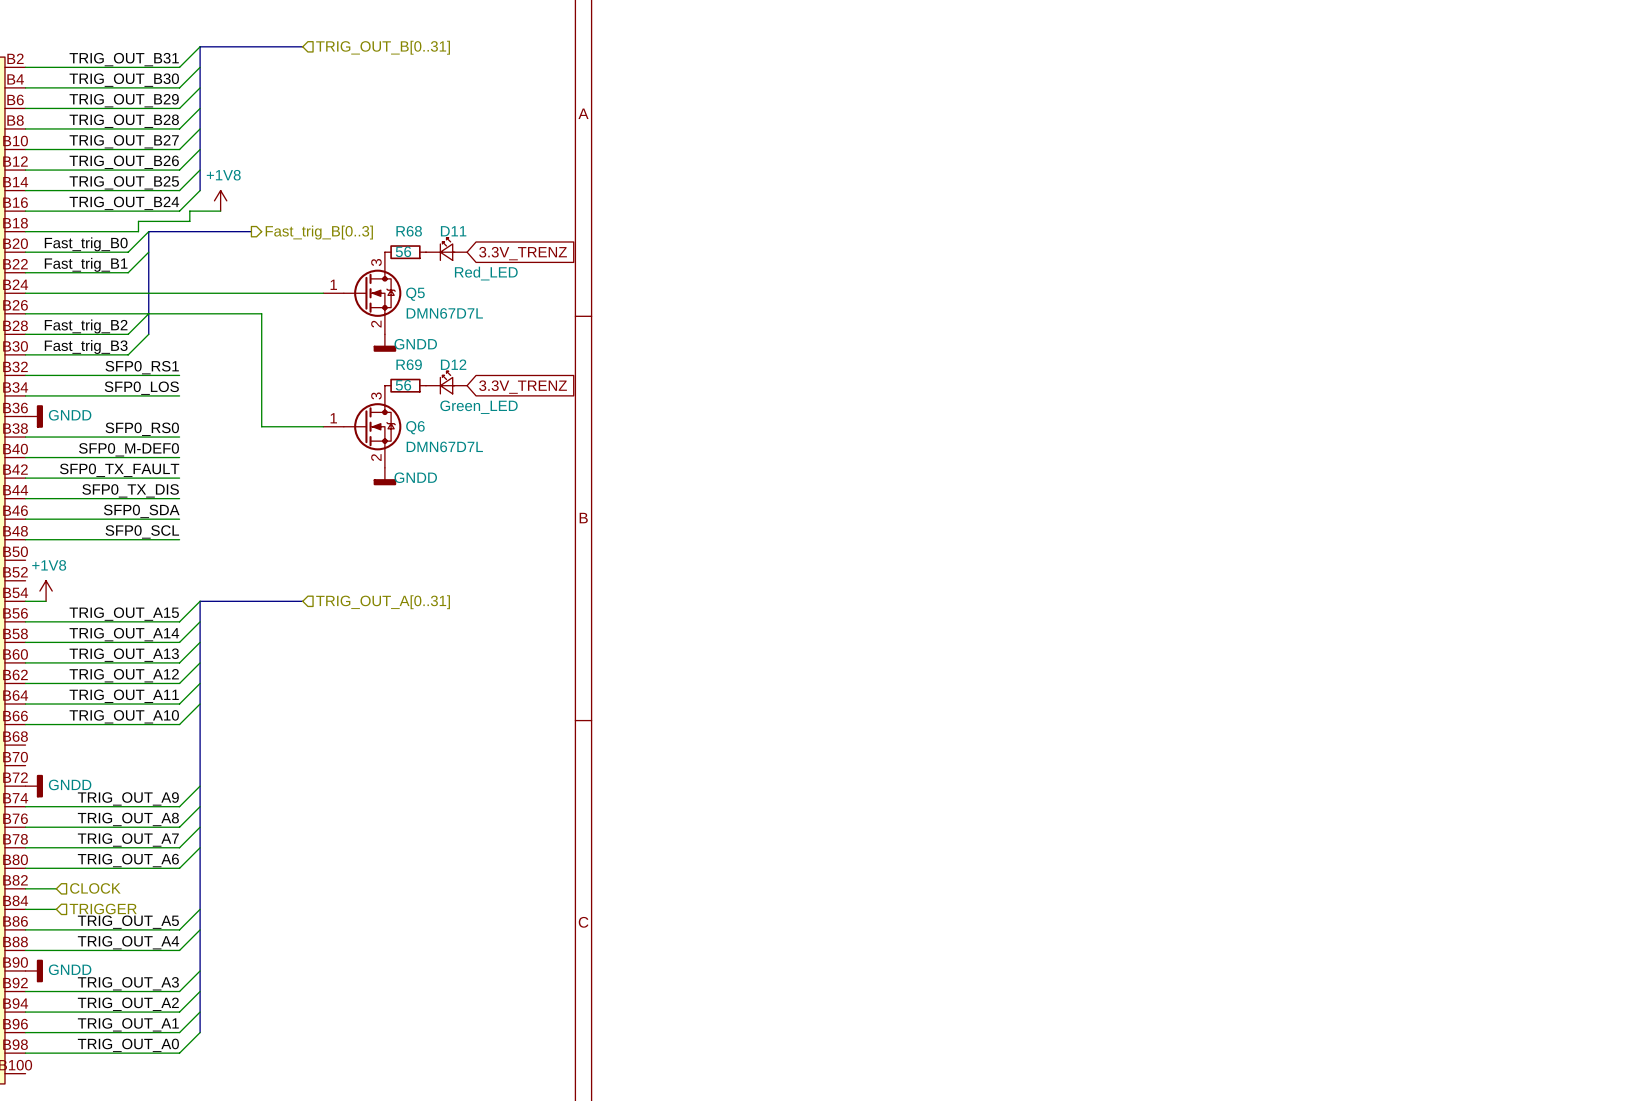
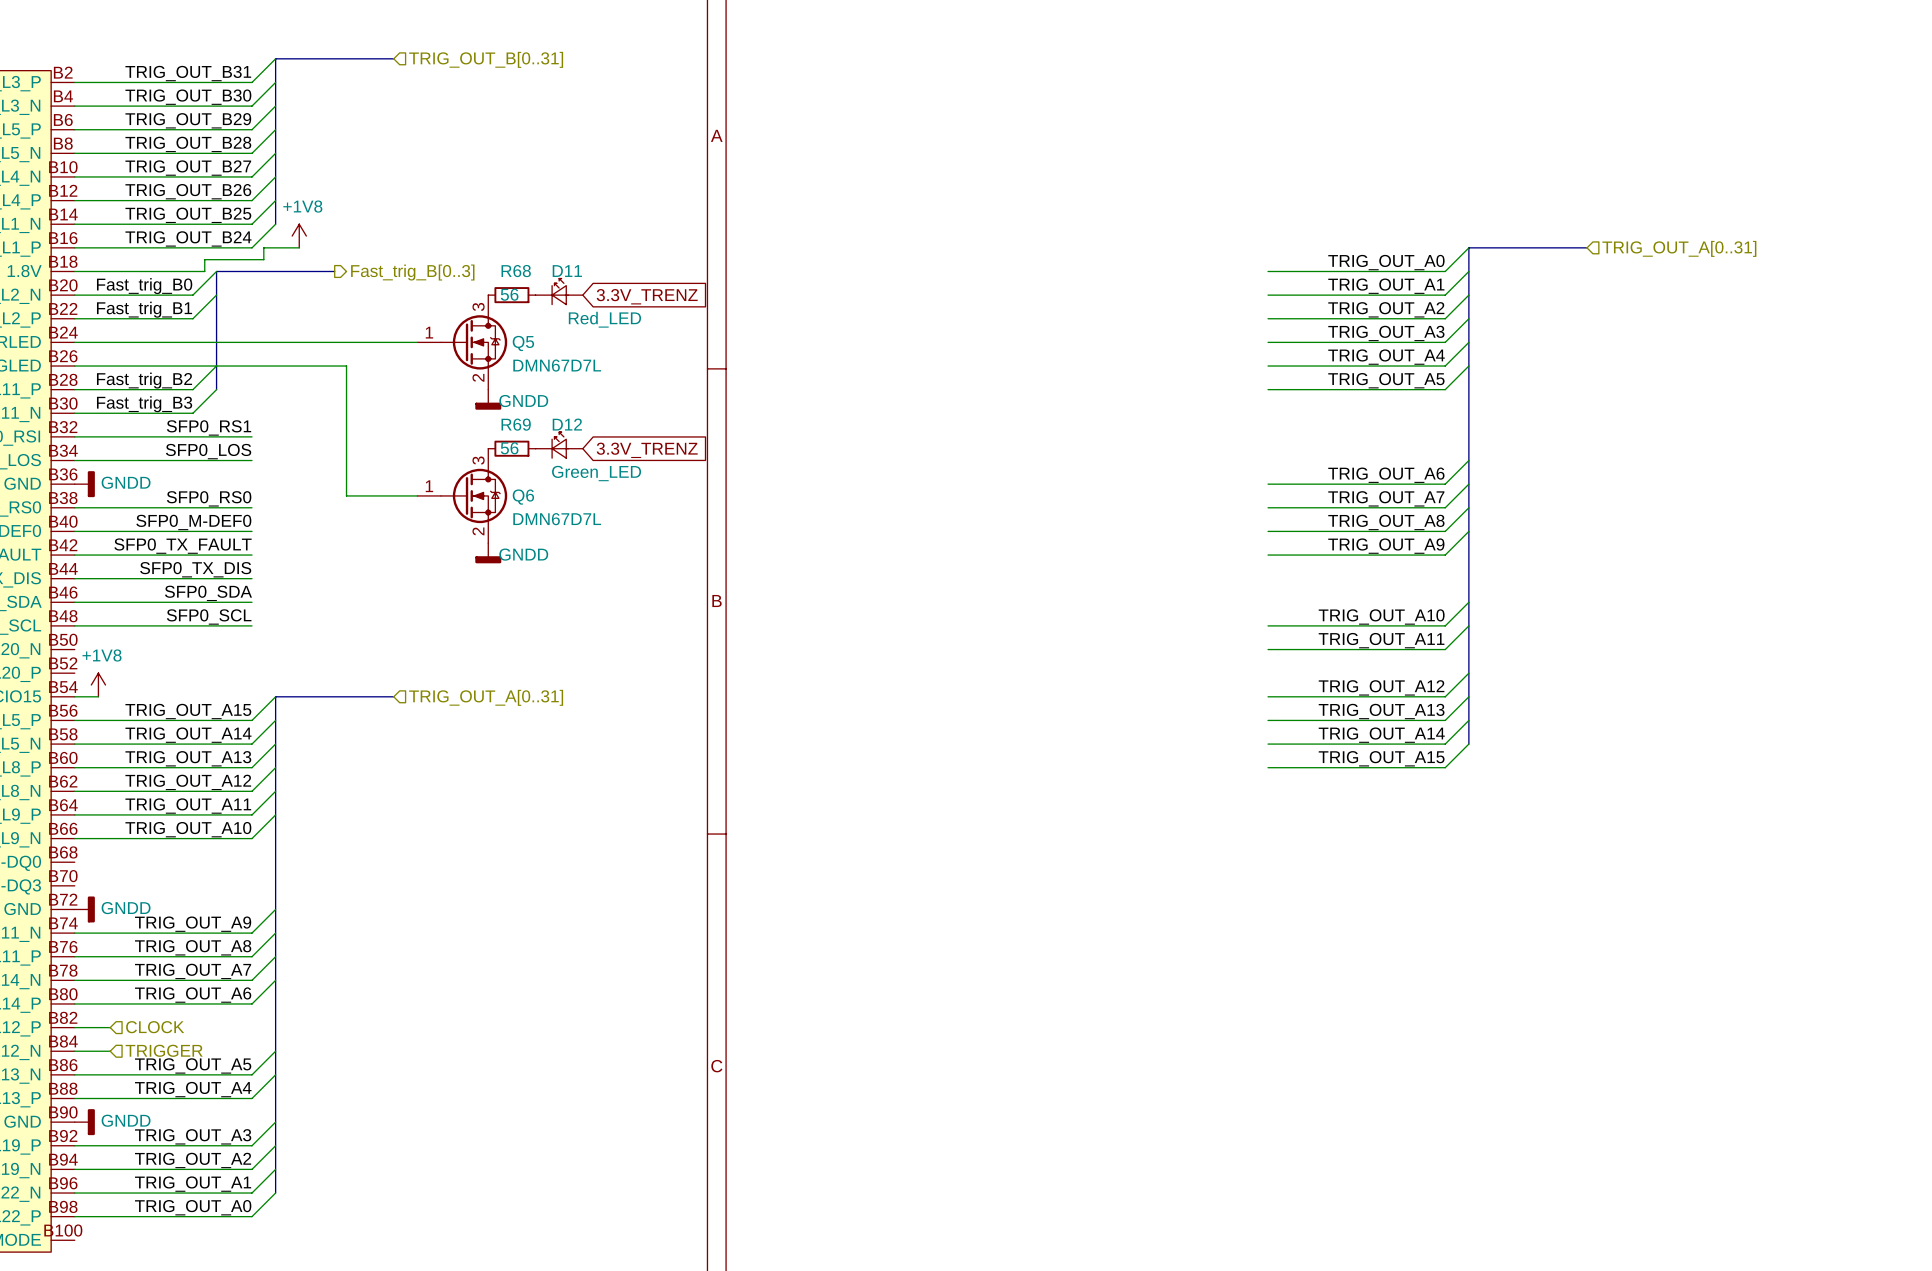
wire: none -> (1468, 247) (1445, 271) (1268, 271)
bus: none -> (1587, 247) (1468, 247) (1468, 744)
hierarchical label: none -> TRIG_OUT_A[0..31] (1679, 248)
label: none -> TRIG_OUT_A0 (1386, 262)
wire: none -> (1468, 271) (1445, 295) (1268, 295)
label: none -> TRIG_OUT_A1 (1386, 286)
wire: none -> (1468, 295) (1445, 318) (1268, 318)
label: none -> TRIG_OUT_A2 (1386, 309)
wire: none -> (1468, 318) (1445, 342) (1268, 342)
label: none -> TRIG_OUT_A3 (1386, 333)
wire: none -> (1468, 342) (1445, 366) (1268, 366)
label: none -> TRIG_OUT_A4 (1386, 357)
wire: none -> (1468, 366) (1445, 389) (1268, 389)
label: none -> TRIG_OUT_A5 (1386, 380)
wire: none -> (1468, 460) (1445, 484) (1268, 484)
label: none -> TRIG_OUT_A6 (1386, 475)
wire: none -> (1468, 484) (1445, 507) (1268, 507)
label: none -> TRIG_OUT_A7 (1386, 498)
wire: none -> (1468, 507) (1445, 531) (1268, 531)
label: none -> TRIG_OUT_A8 (1386, 522)
wire: none -> (1468, 531) (1445, 555) (1268, 555)
label: none -> TRIG_OUT_A9 (1386, 546)
wire: none -> (1468, 602) (1445, 625) (1268, 625)
label: none -> TRIG_OUT_A10 (1381, 617)
wire: none -> (1468, 625) (1445, 649) (1268, 649)
label: none -> TRIG_OUT_A11 (1381, 640)
wire: none -> (1468, 673) (1445, 696) (1268, 696)
label: none -> TRIG_OUT_A12 (1381, 687)
wire: none -> (1468, 696) (1445, 720) (1268, 720)
label: none -> TRIG_OUT_A13 (1381, 711)
wire: none -> (1468, 720) (1445, 744) (1268, 744)
label: none -> TRIG_OUT_A14 (1381, 735)
wire: none -> (1468, 744) (1445, 767) (1268, 767)
label: none -> TRIG_OUT_A15 (1381, 758)

